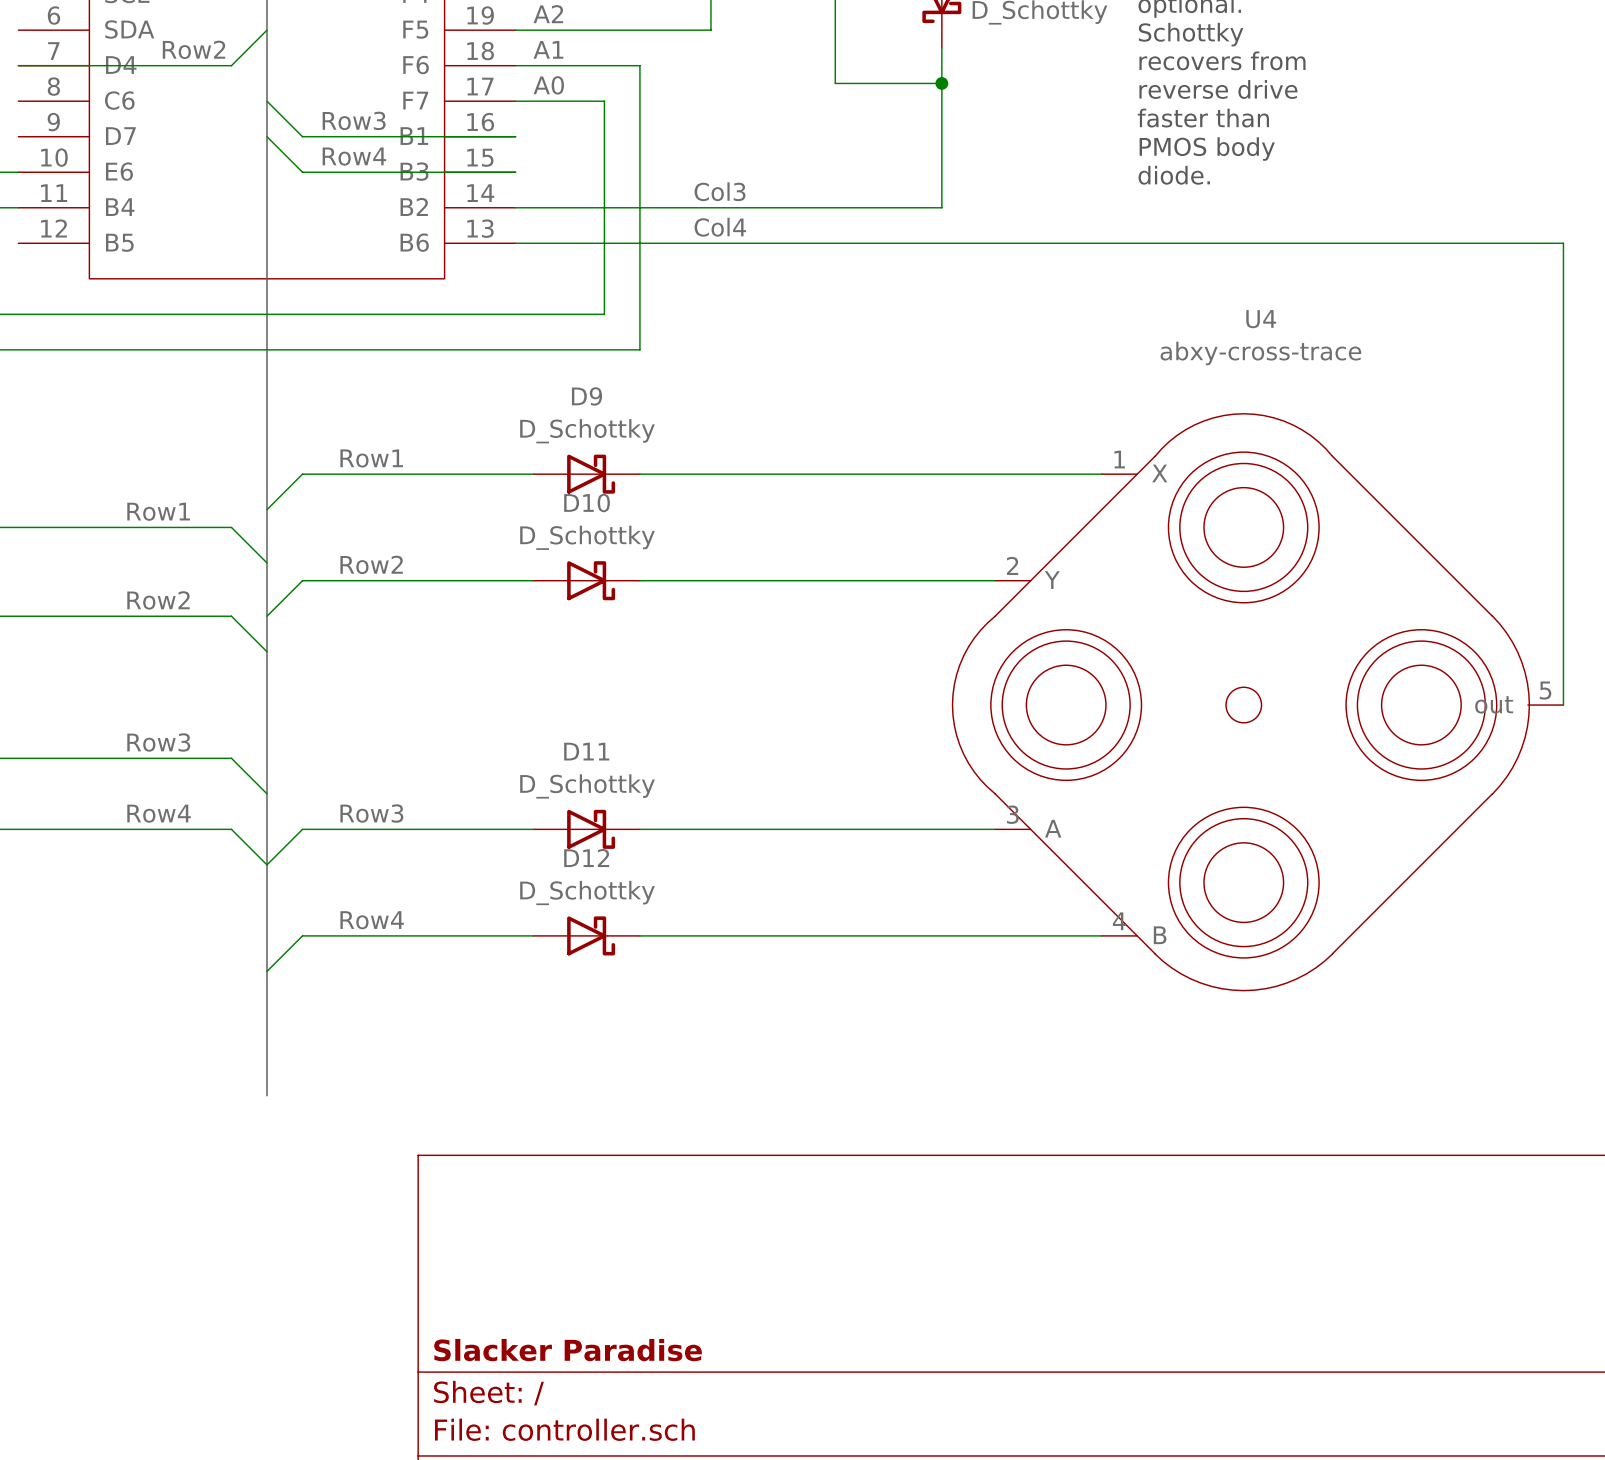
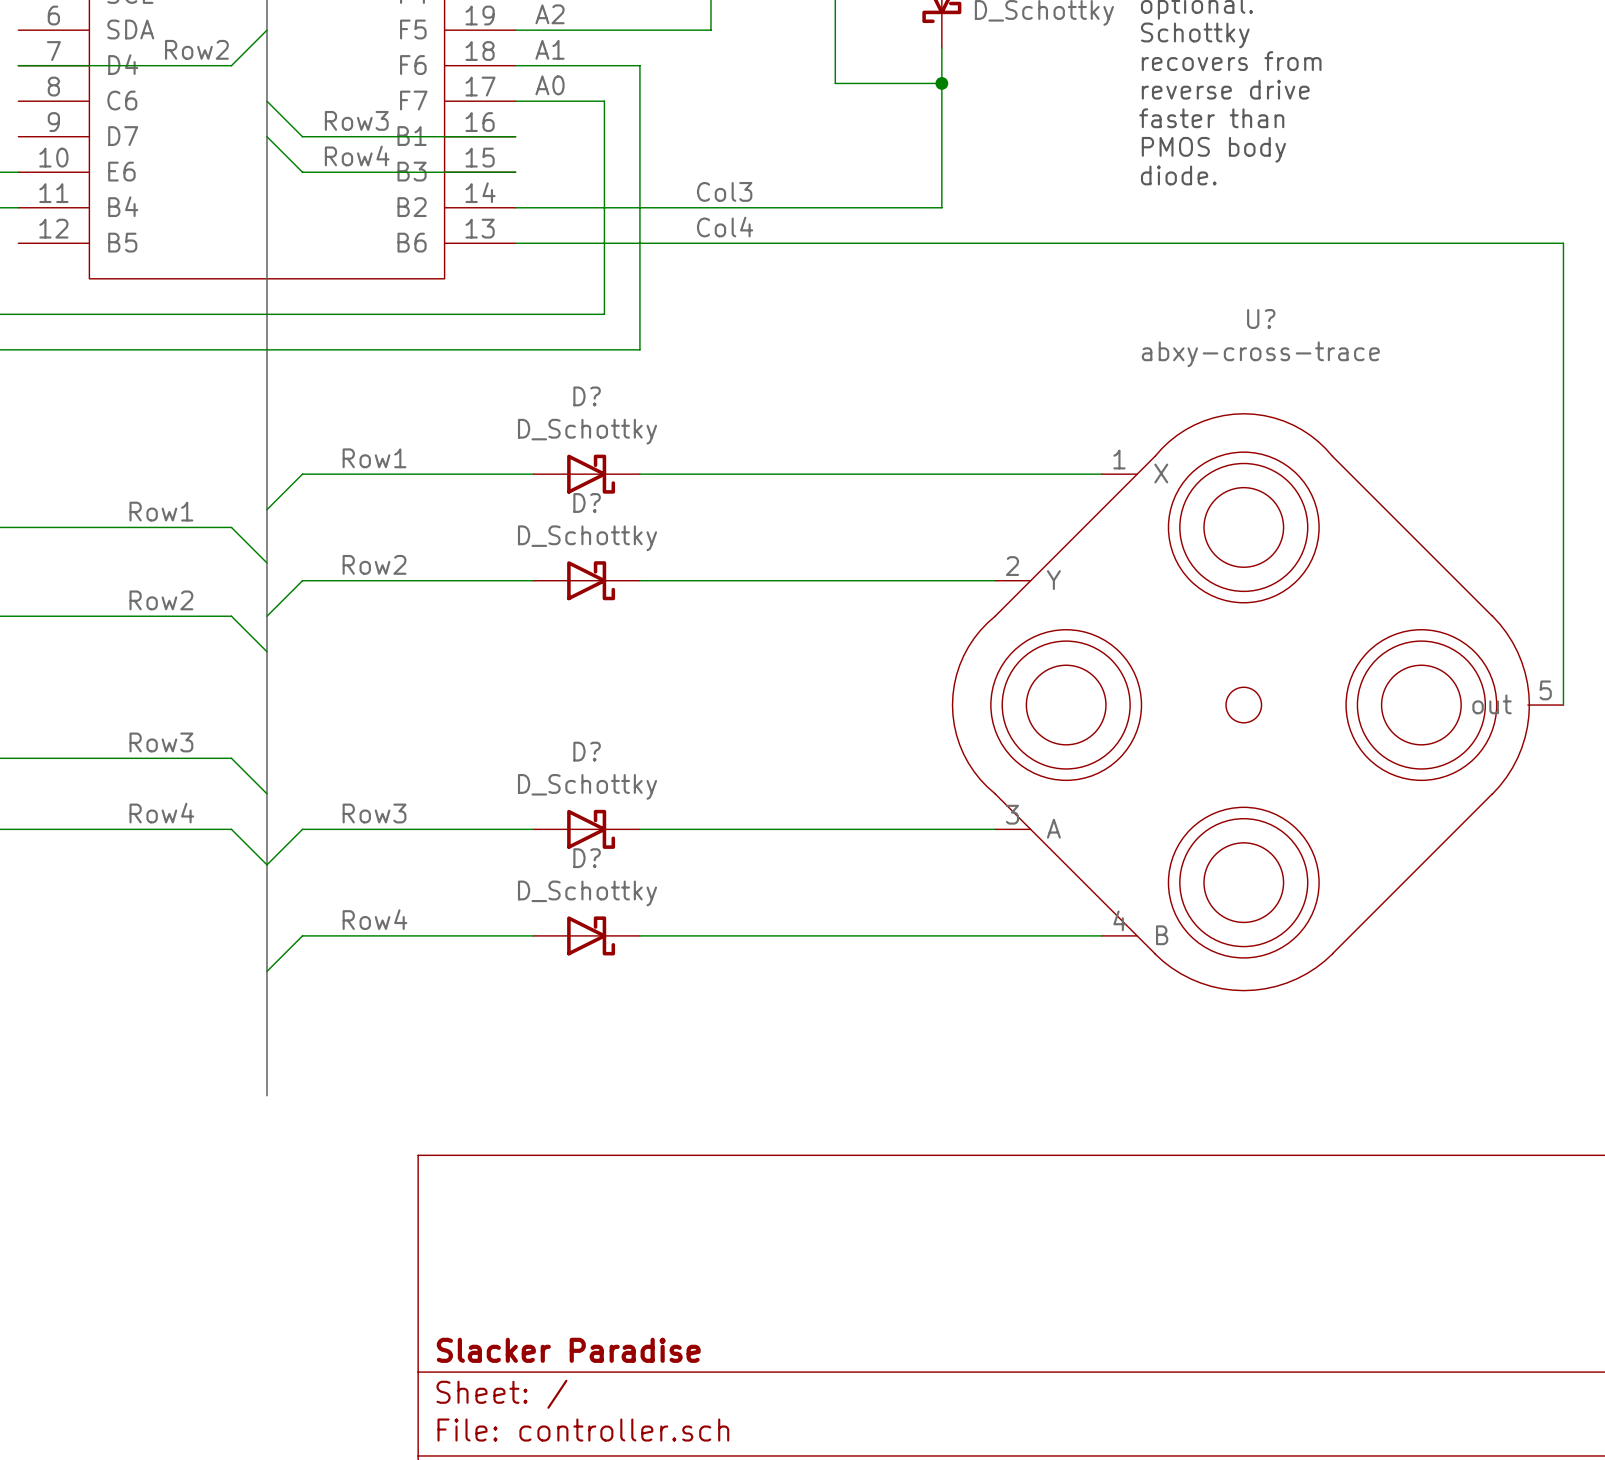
U4 name: U4 (1261, 319) -> U? (1261, 318)
D9 name: D9 (587, 396) -> D? (587, 396)
D10 name: D10 (587, 502) -> D? (587, 502)
D11 name: D11 (586, 751) -> D? (587, 751)
D12 name: D12 (586, 858) -> D? (587, 858)

